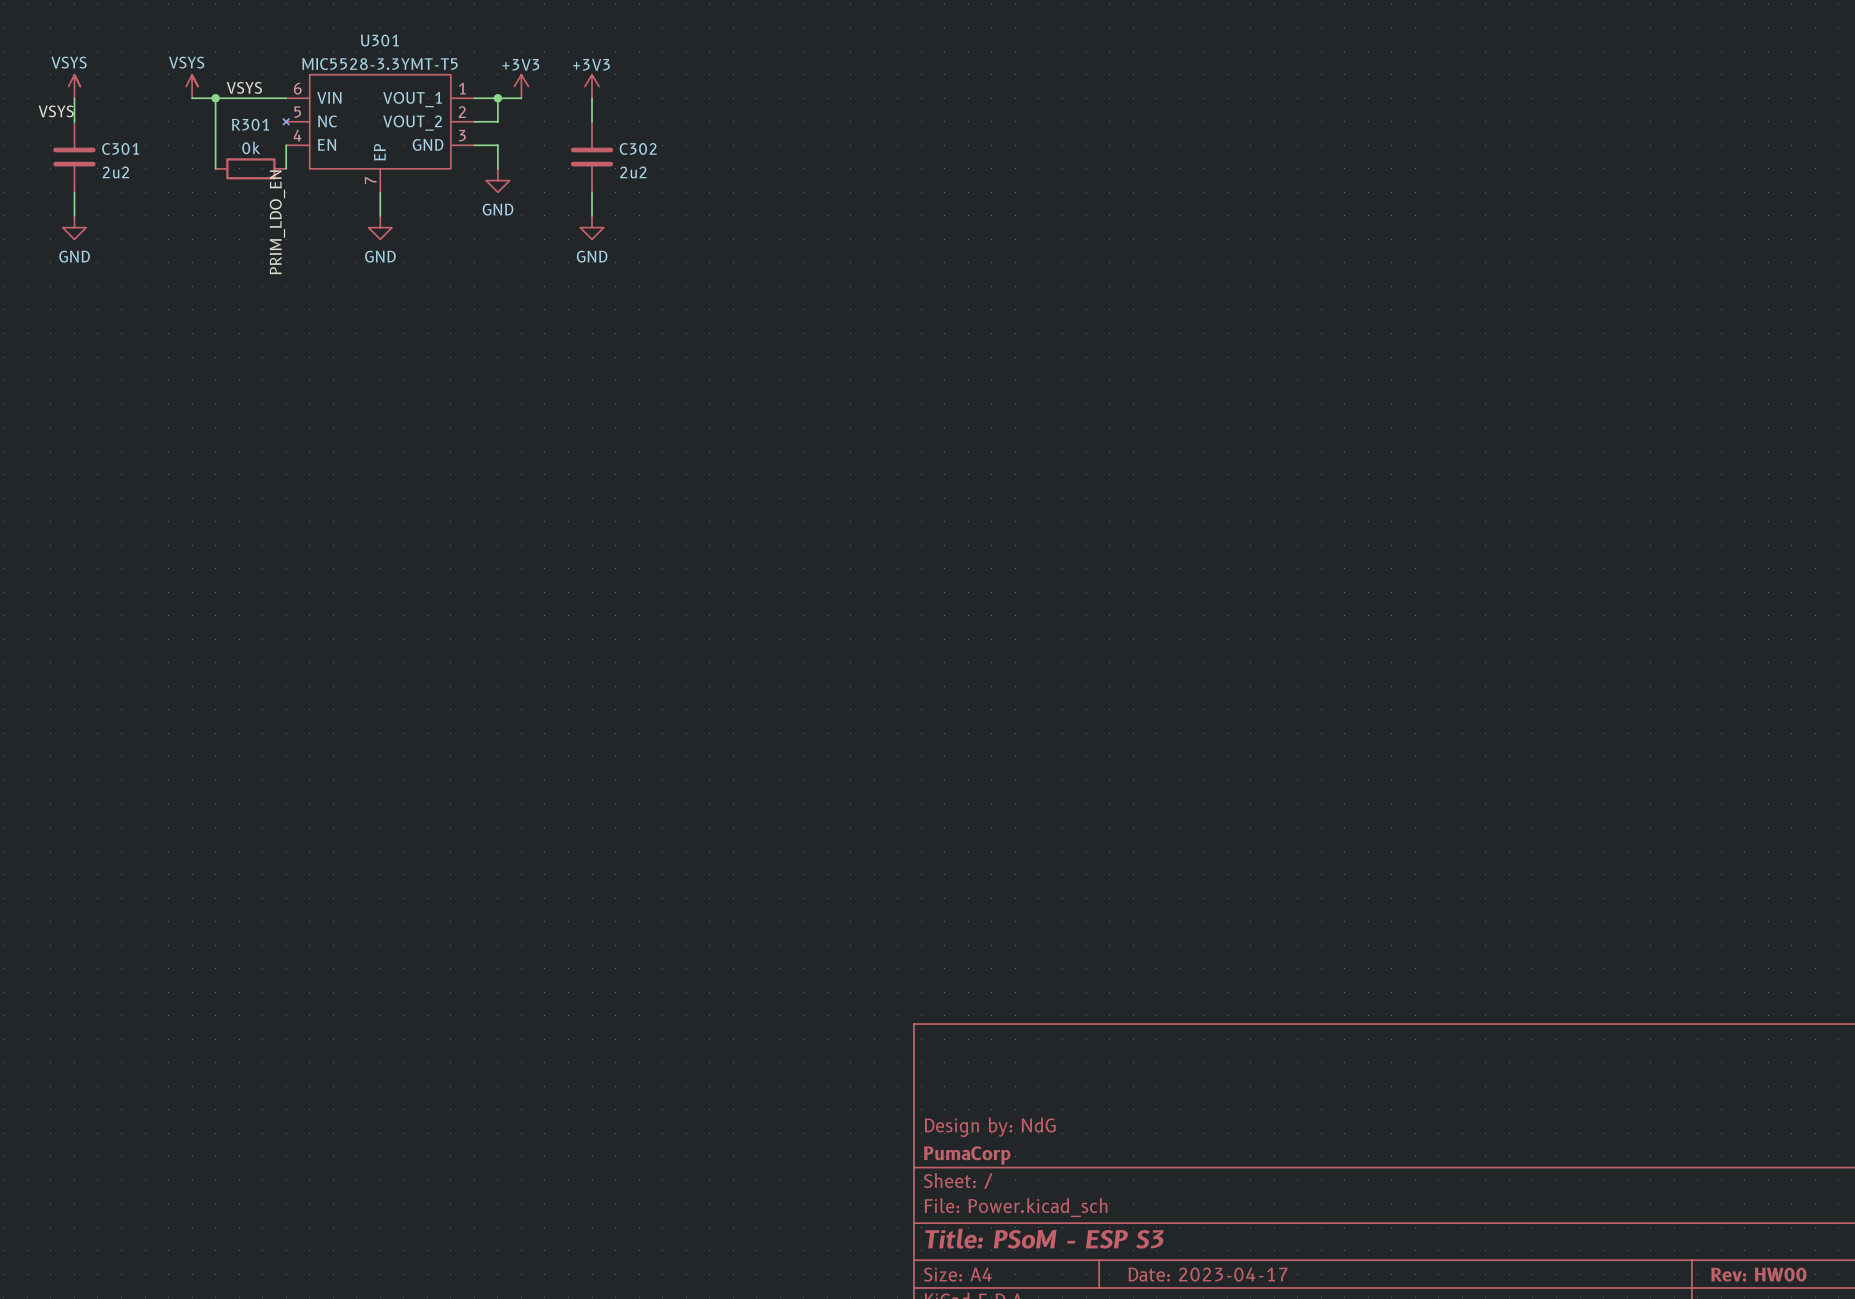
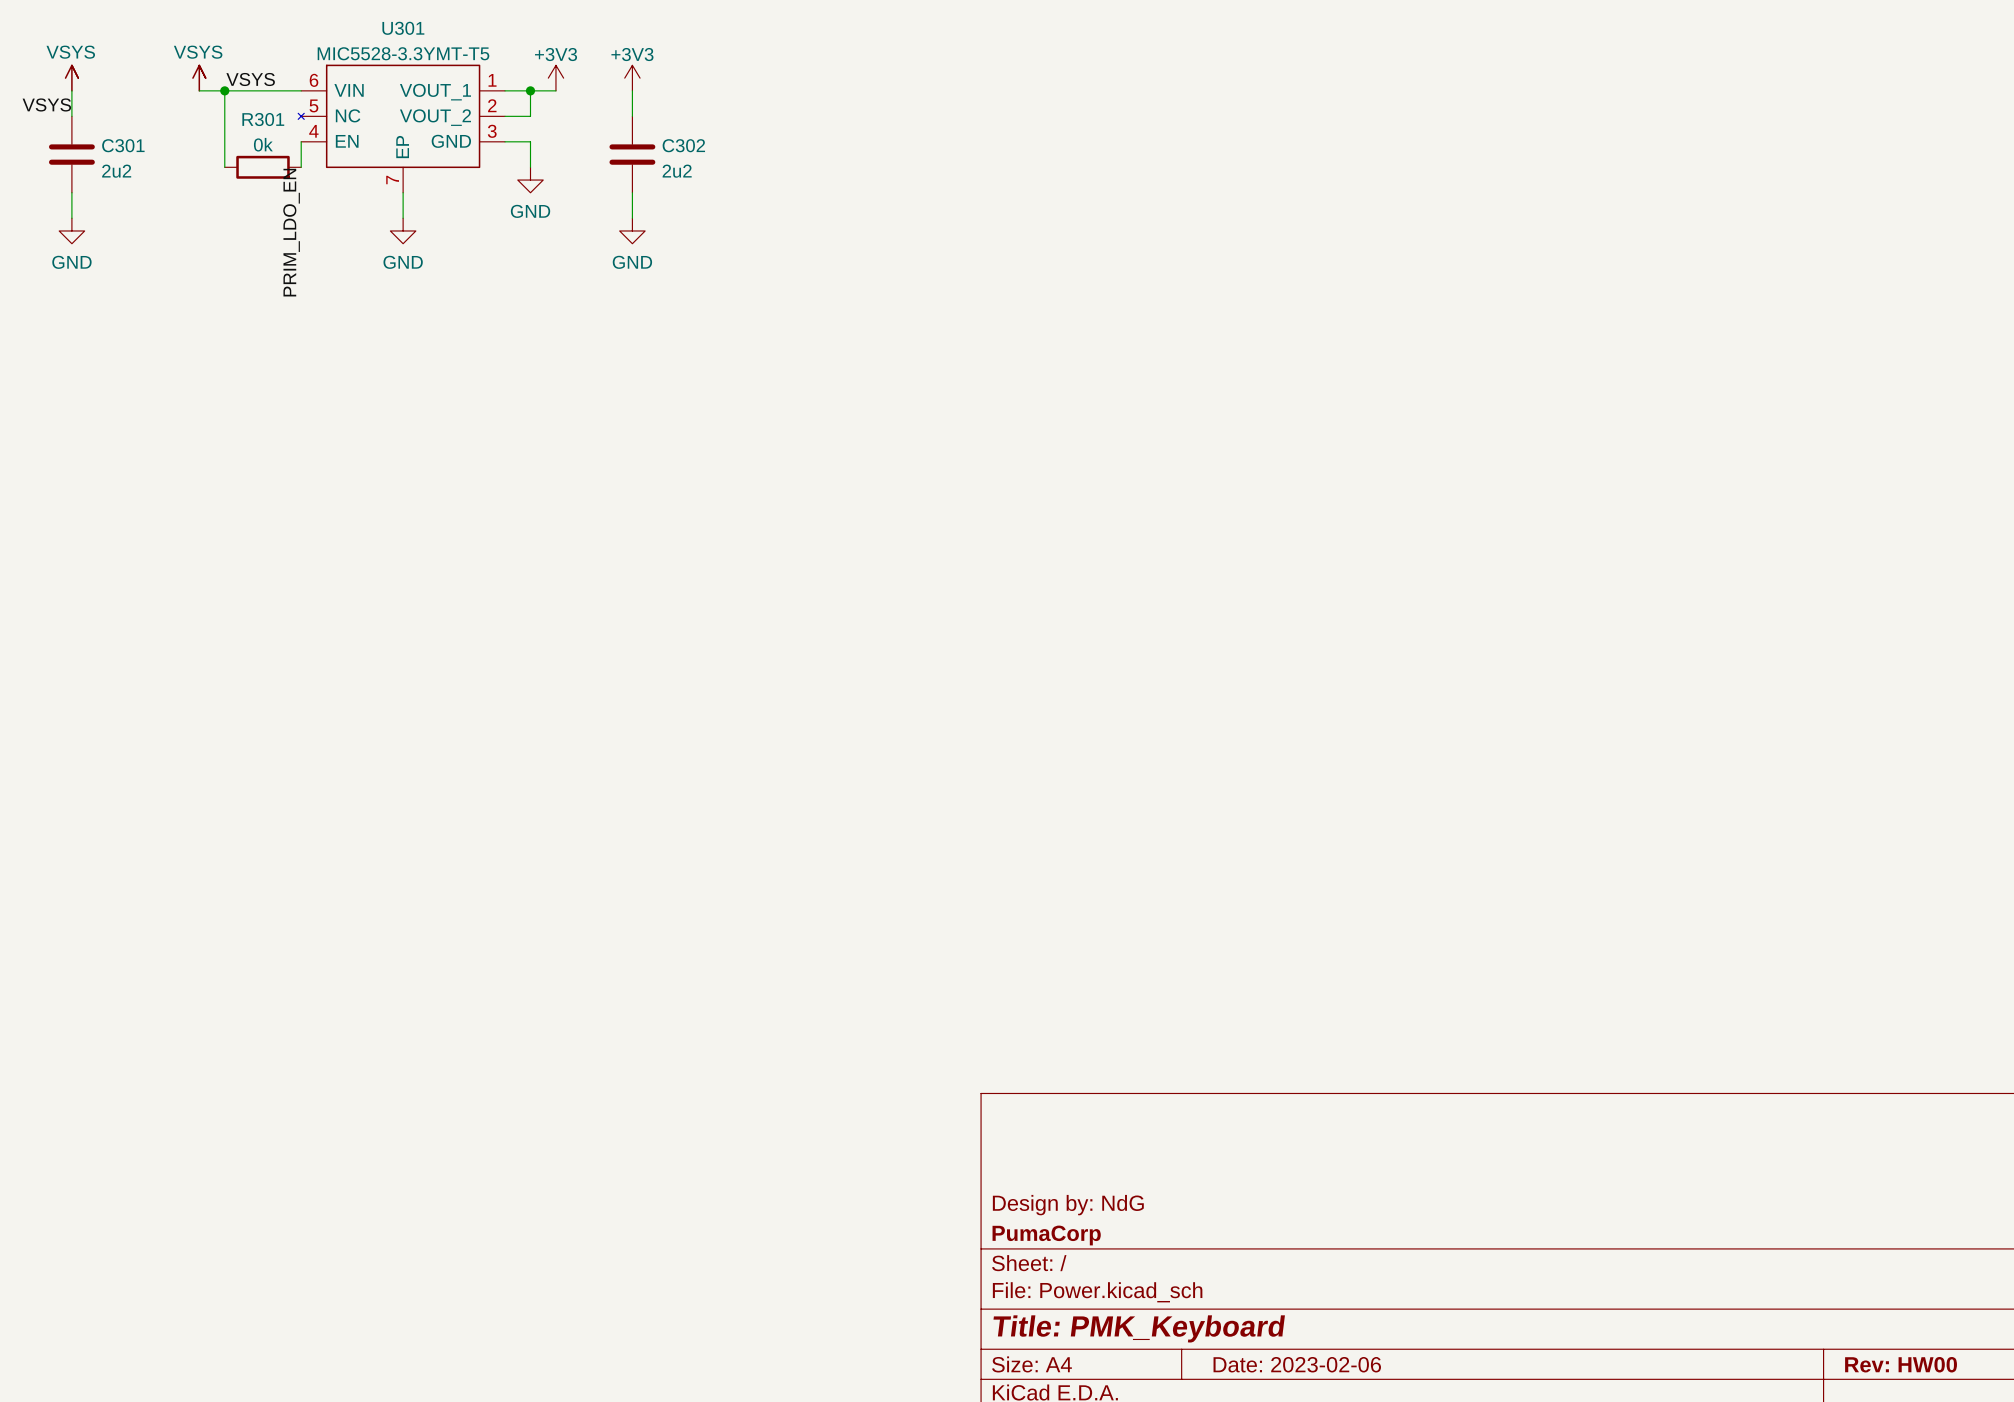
title block: Title: PSoM - ESP S3 (1044, 1238) -> Title: PMK_Keyboard (1139, 1328)
title block: Date: 2023-04-17 (1207, 1274) -> Date: 2023-02-06 (1297, 1364)

